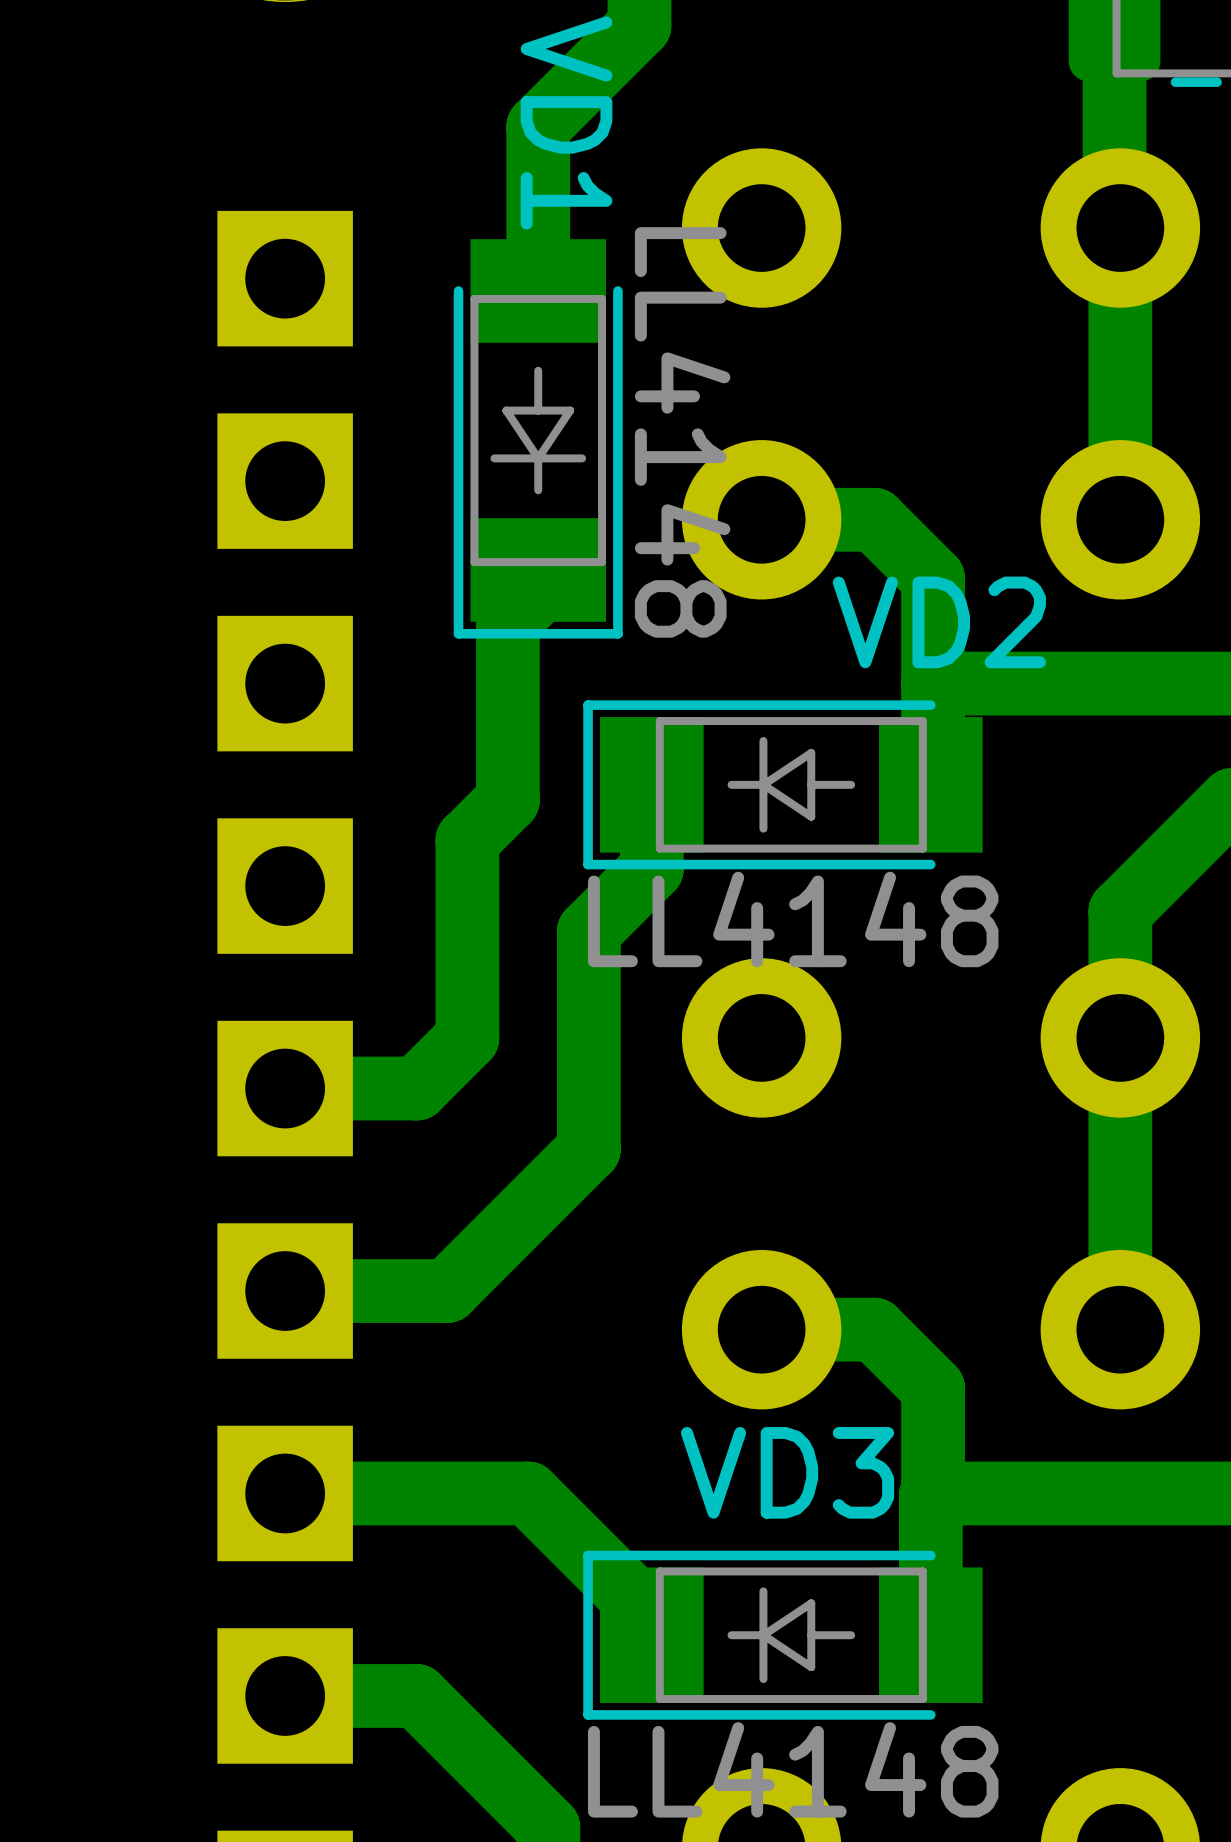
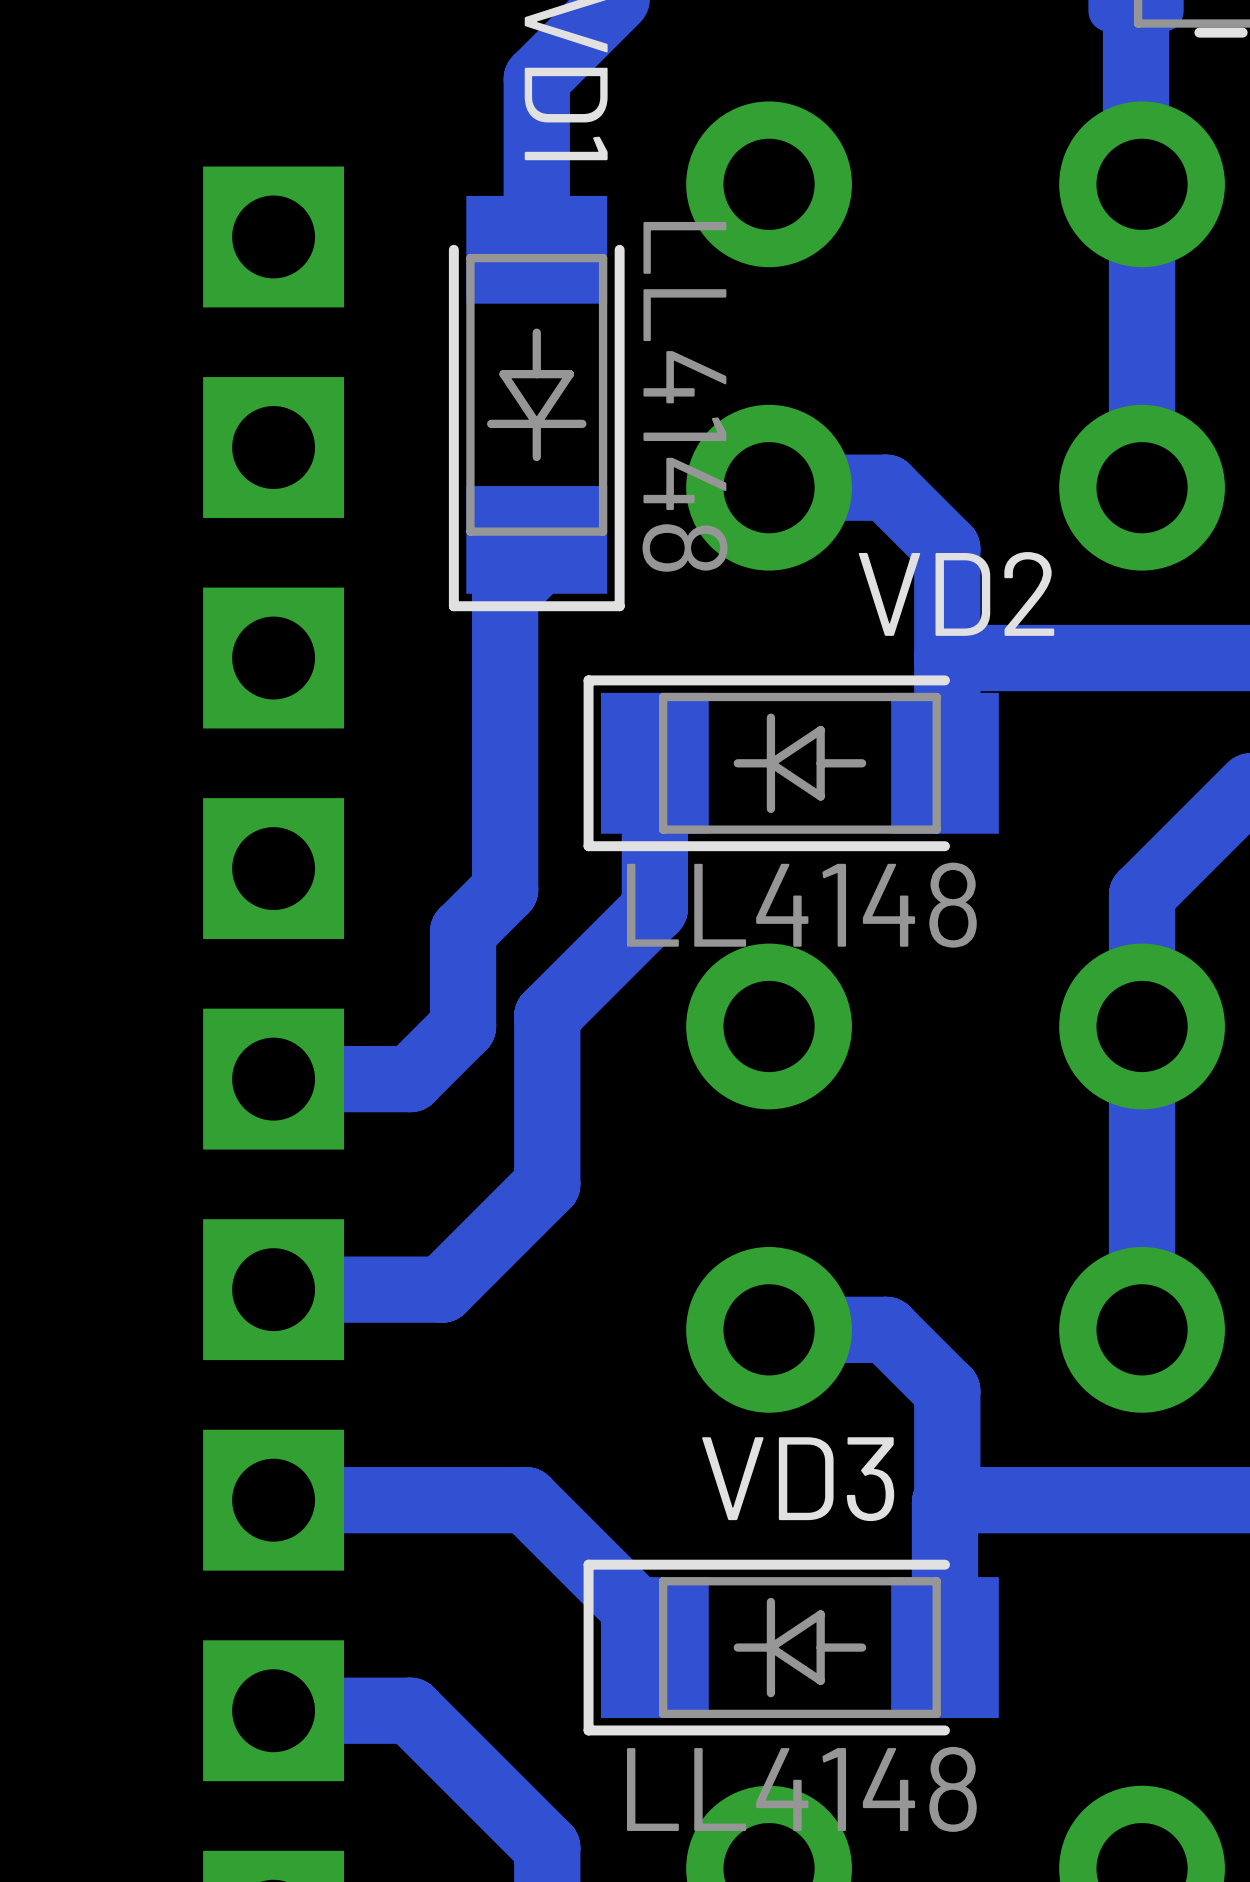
bottom track: (507, 800) (467, 840) (467, 946) -> (505, 779) (505, 889) (463, 931)
bottom track: (651, 868) (588, 931) (588, 1149) (548, 1189) -> (654, 850) (654, 908) (547, 1015) (547, 1184)

